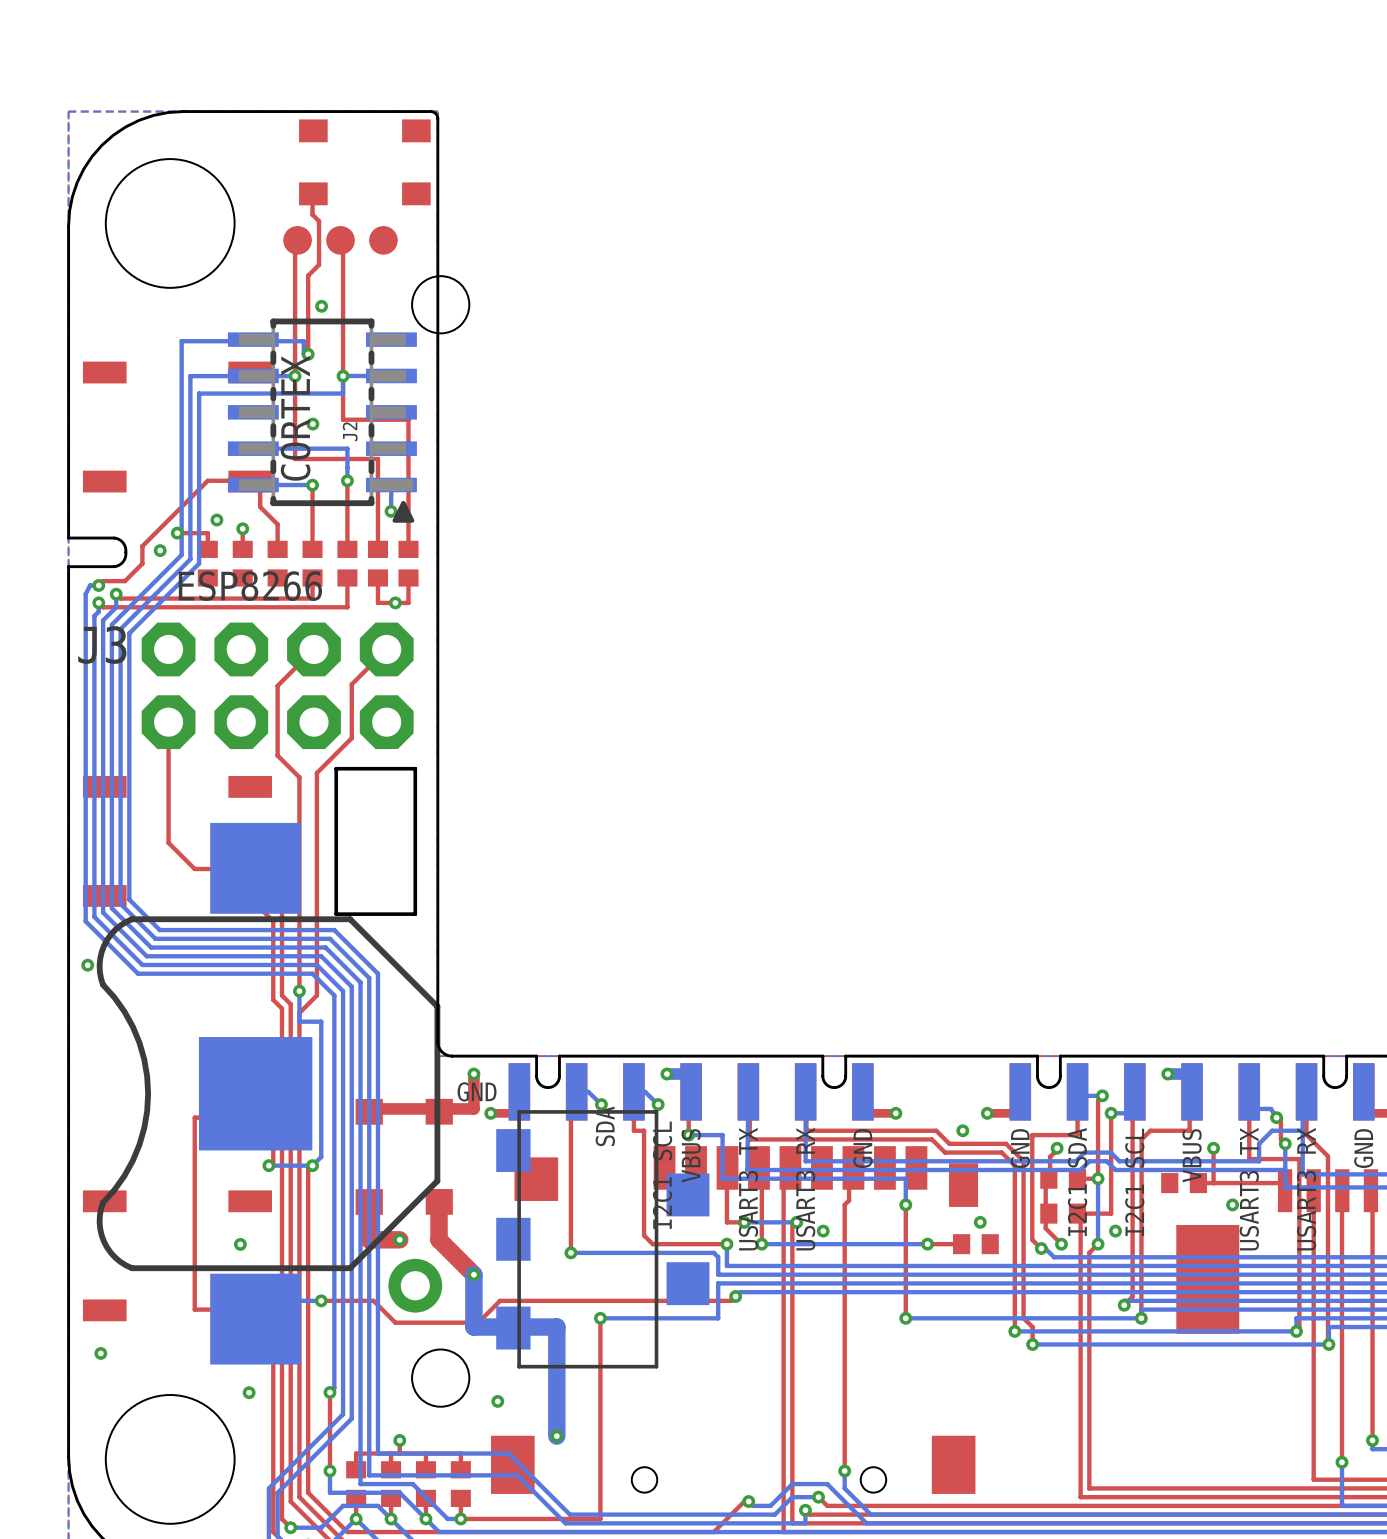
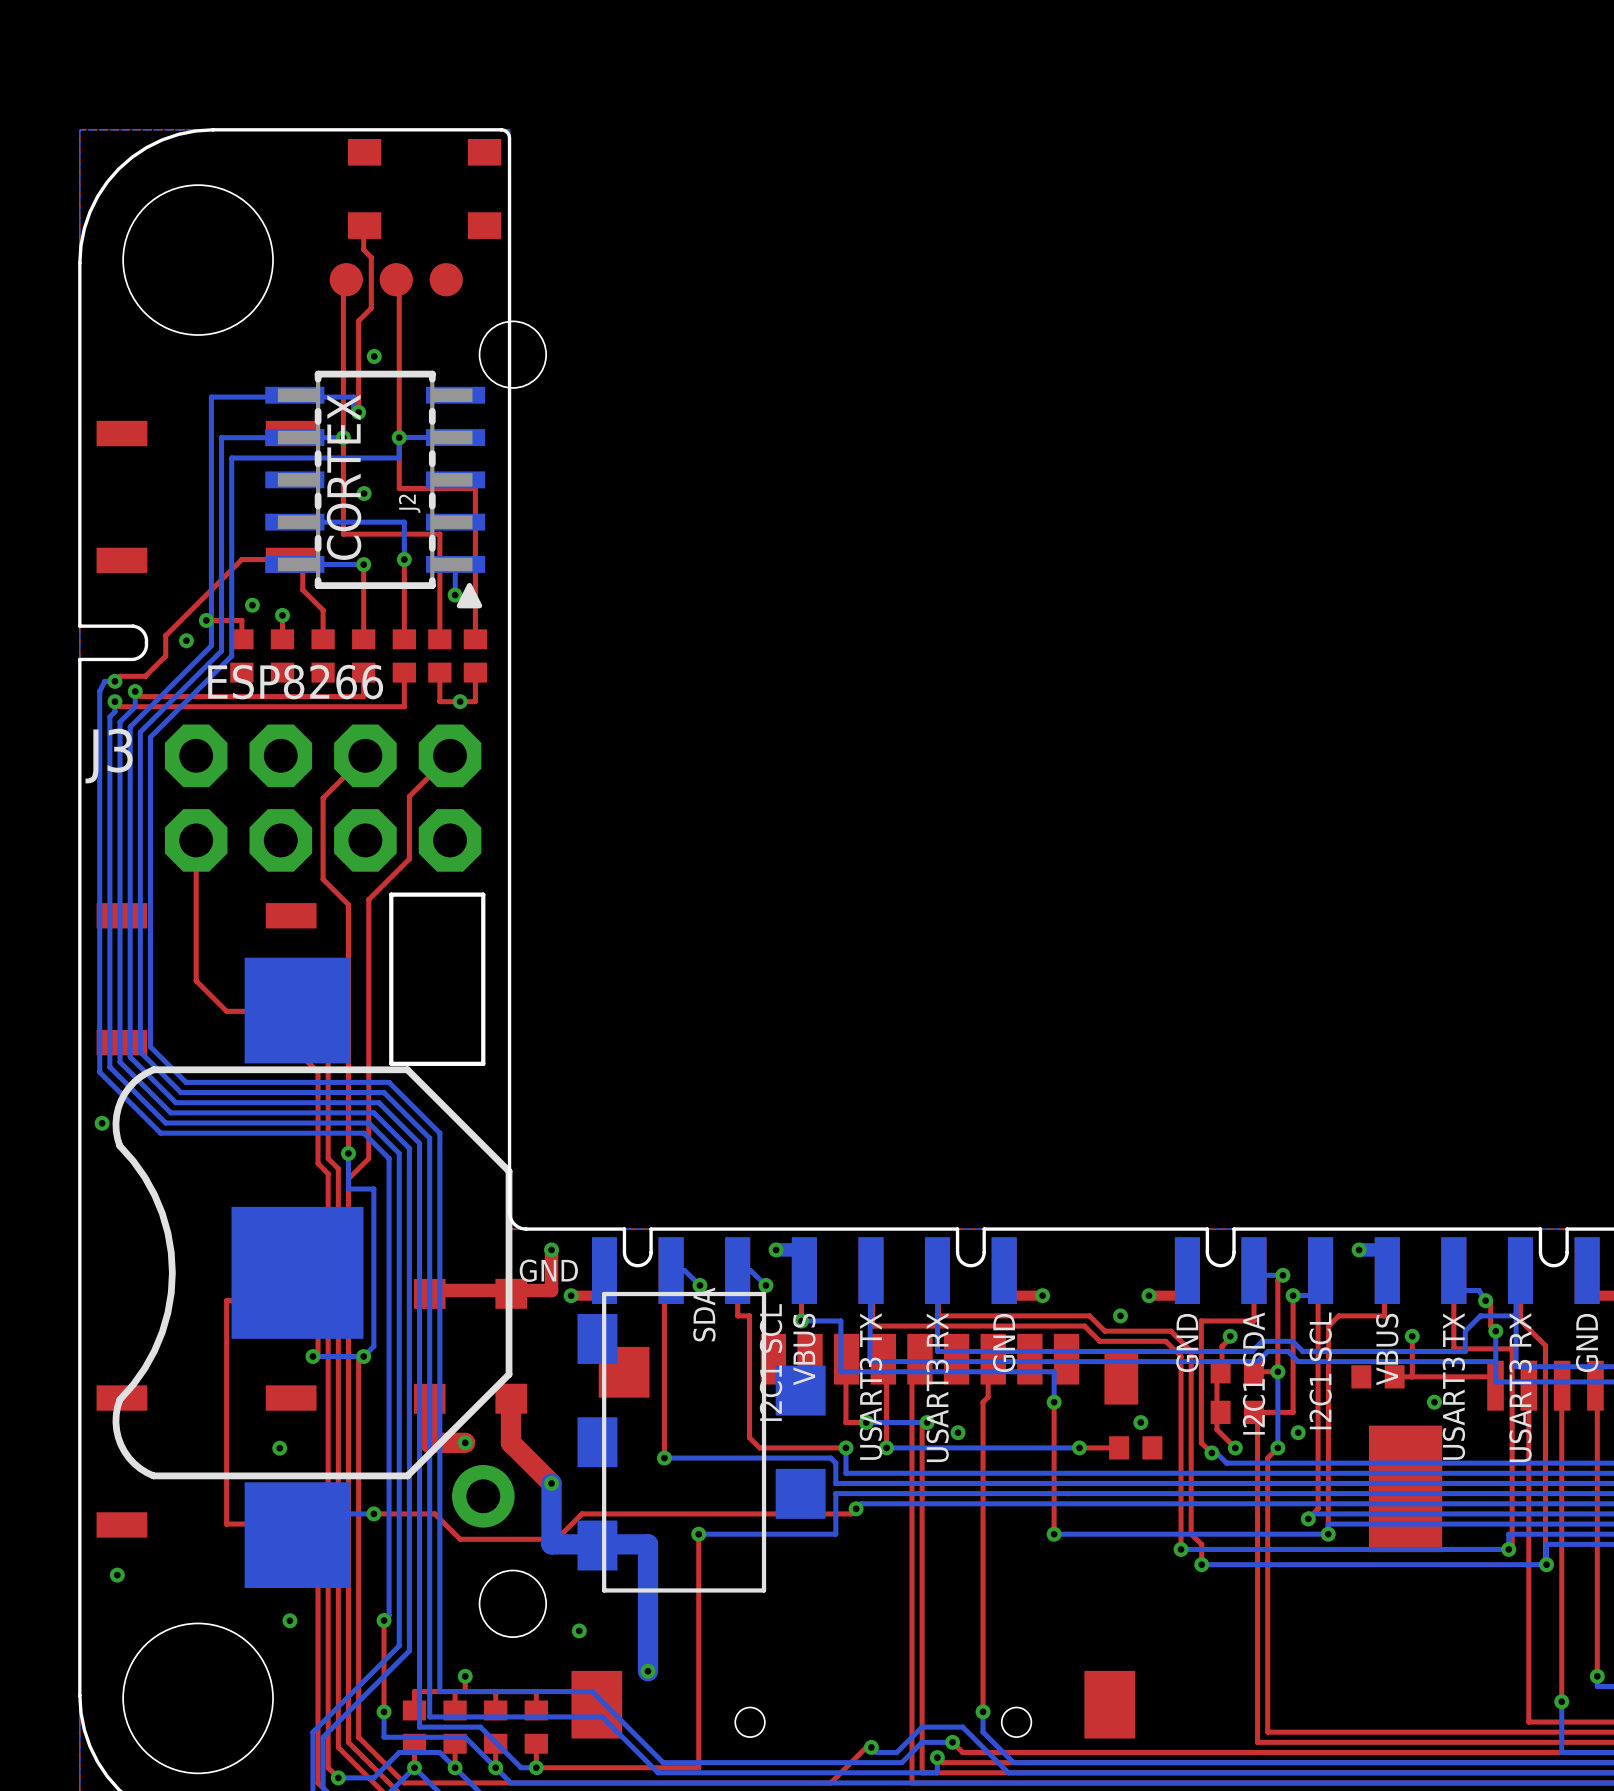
J2 footprint: [227, 318, 417, 507] -> [265, 370, 486, 589]

